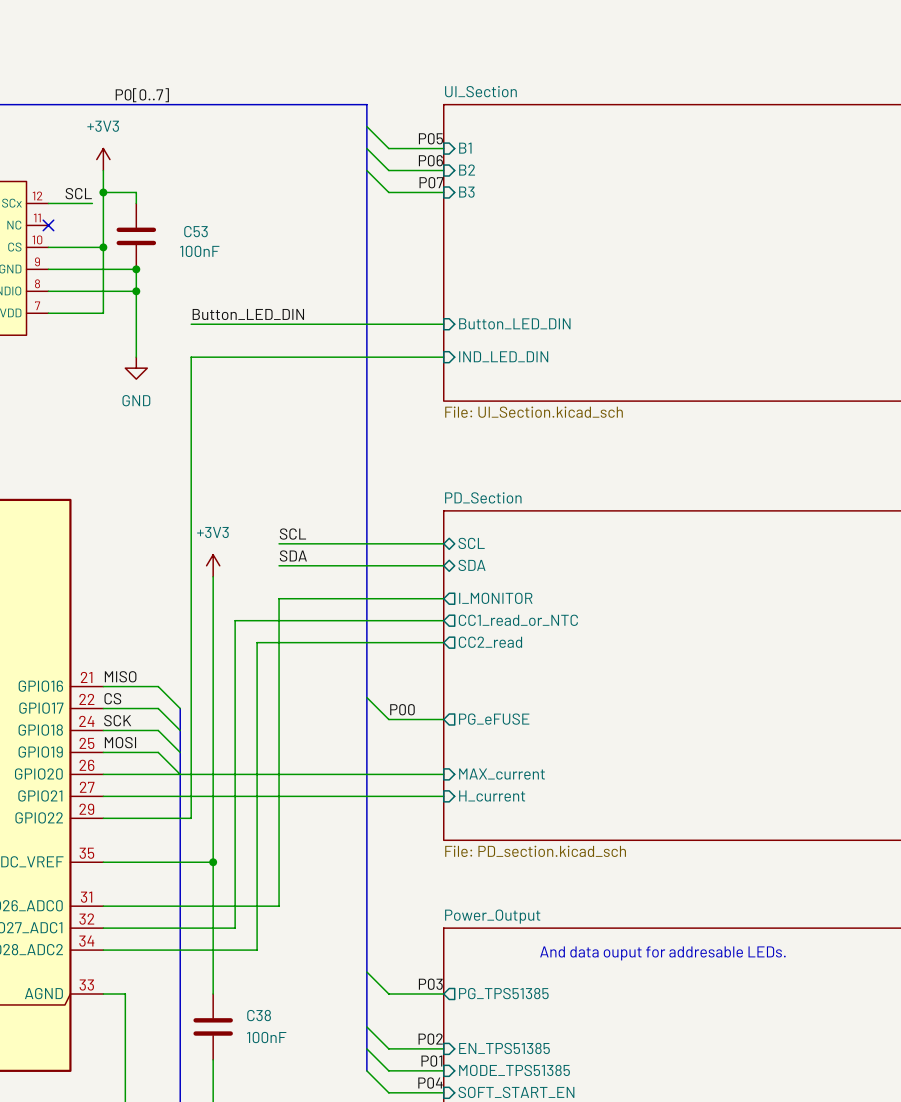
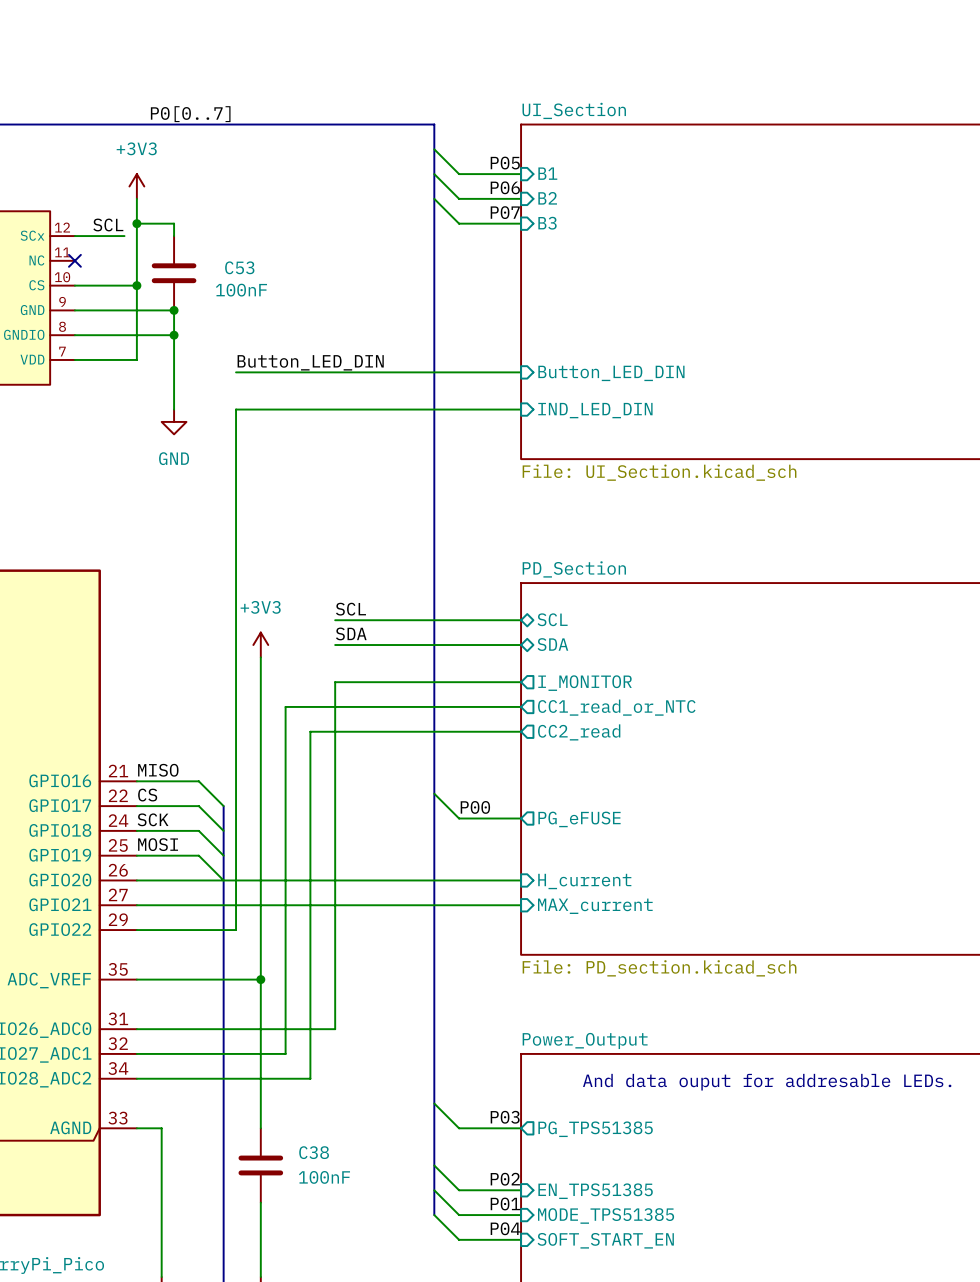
sheet pin: MAX_current (502, 774) -> H_current (584, 881)
sheet pin: H_current (492, 796) -> MAX_current (595, 906)

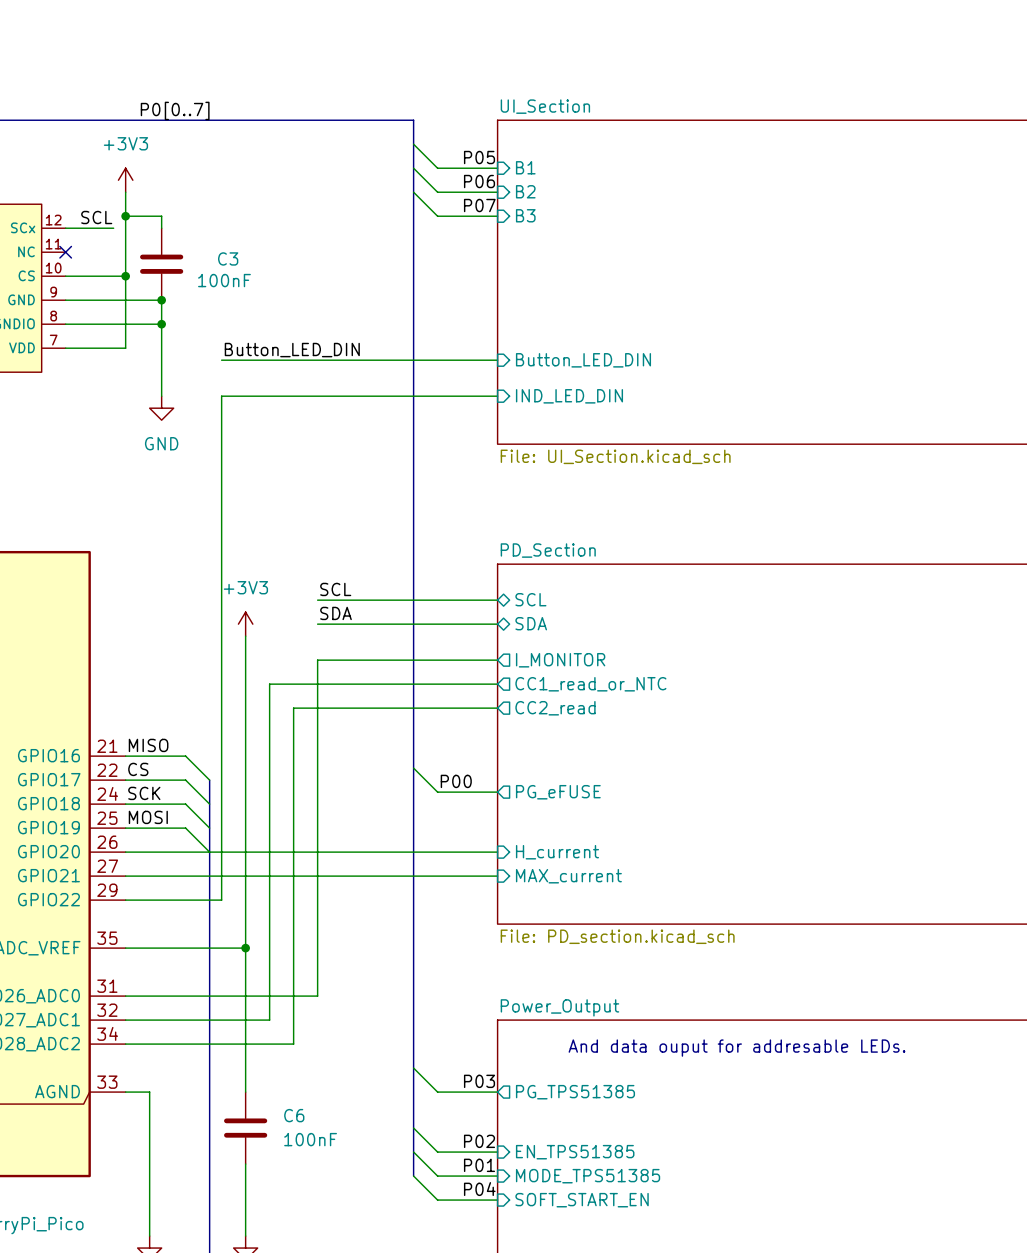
C53 name: C53 (239, 267) -> C3 (228, 258)
C38 name: C38 (314, 1152) -> C6 (294, 1115)

